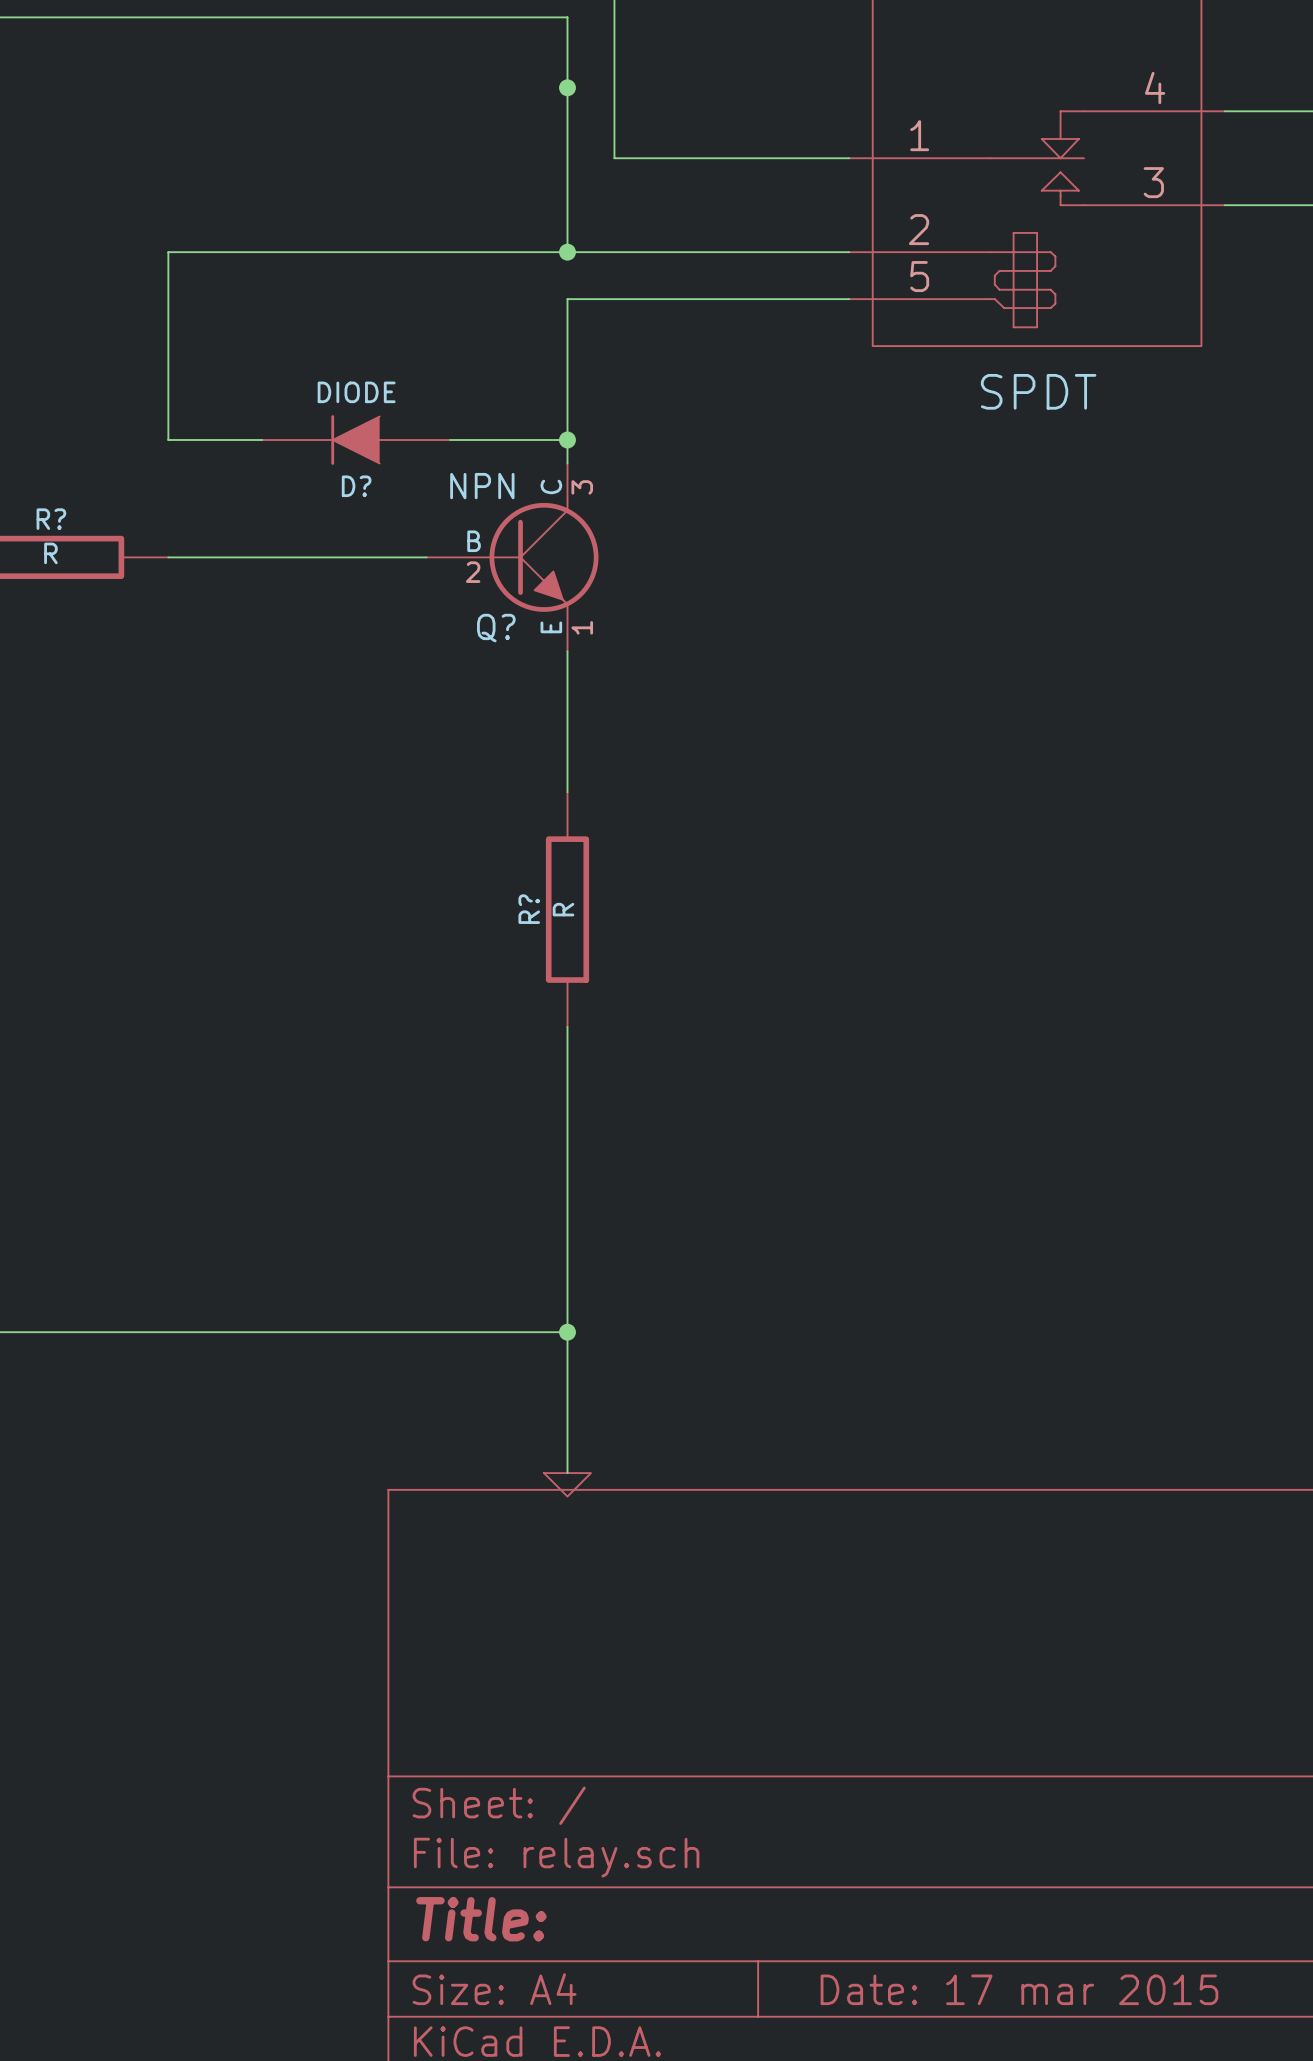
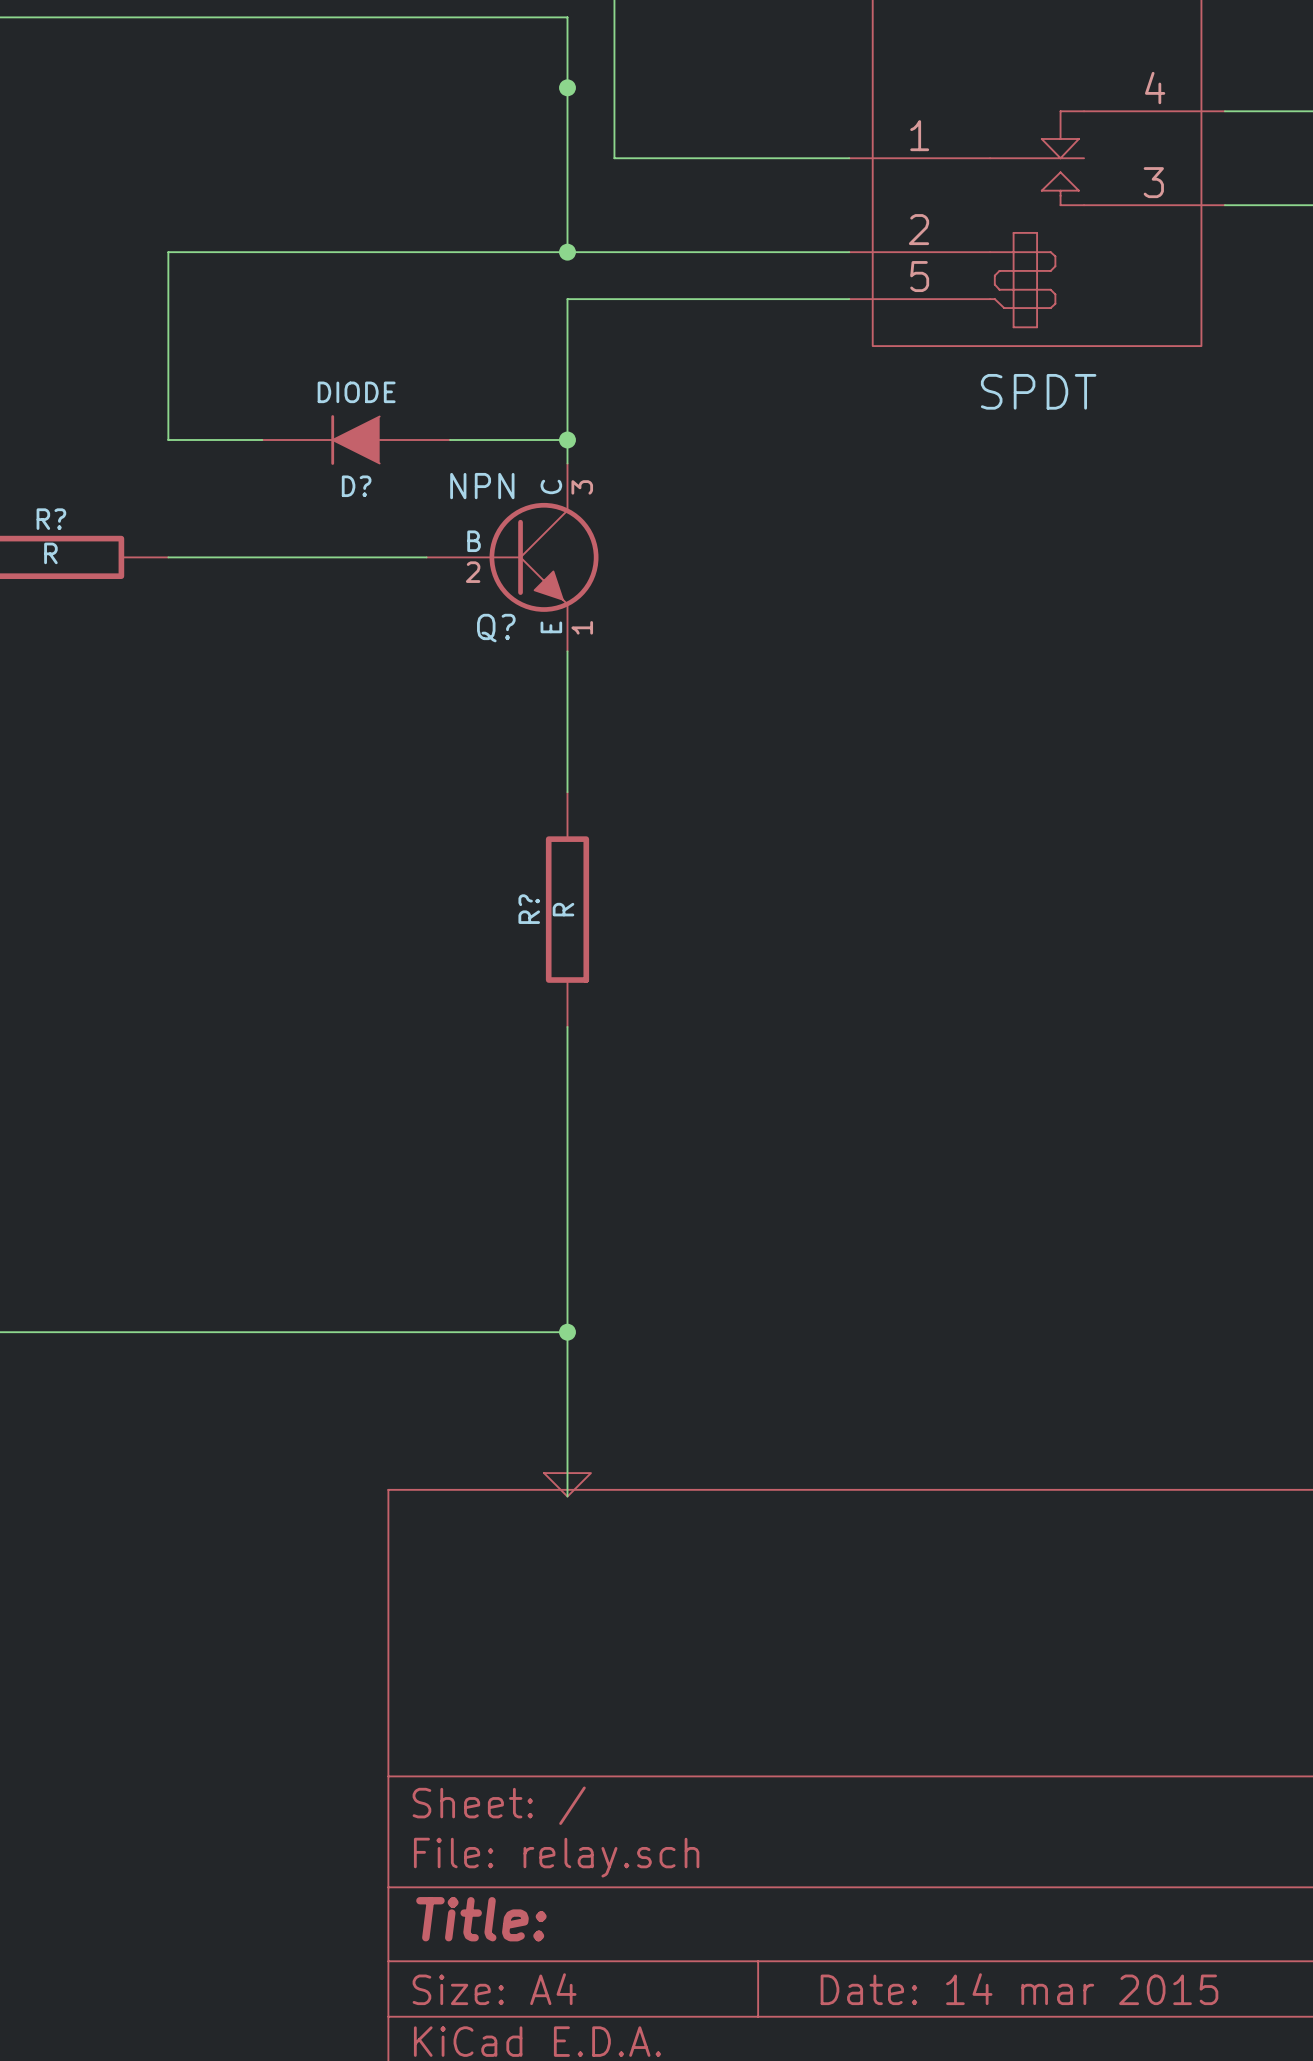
wire: none -> (567, 1473) (567, 1496)
title block: Date: 17 mar 2015 (1019, 1989) -> Date: 14 mar 2015 (1019, 1989)

